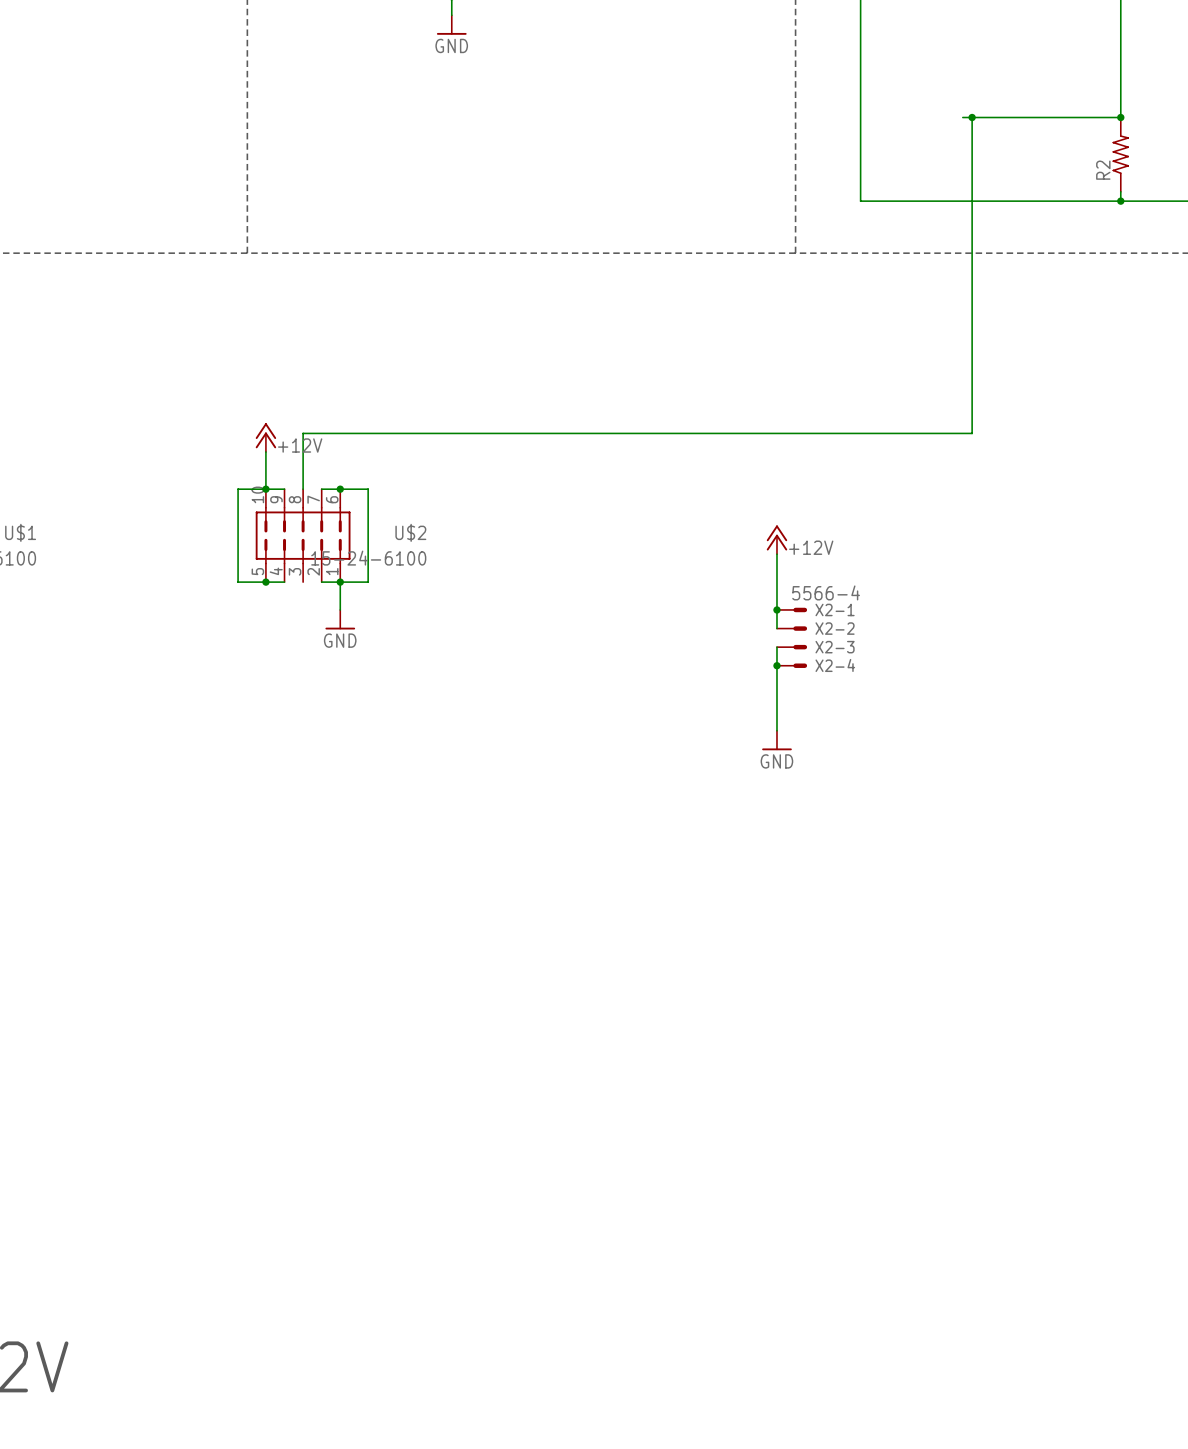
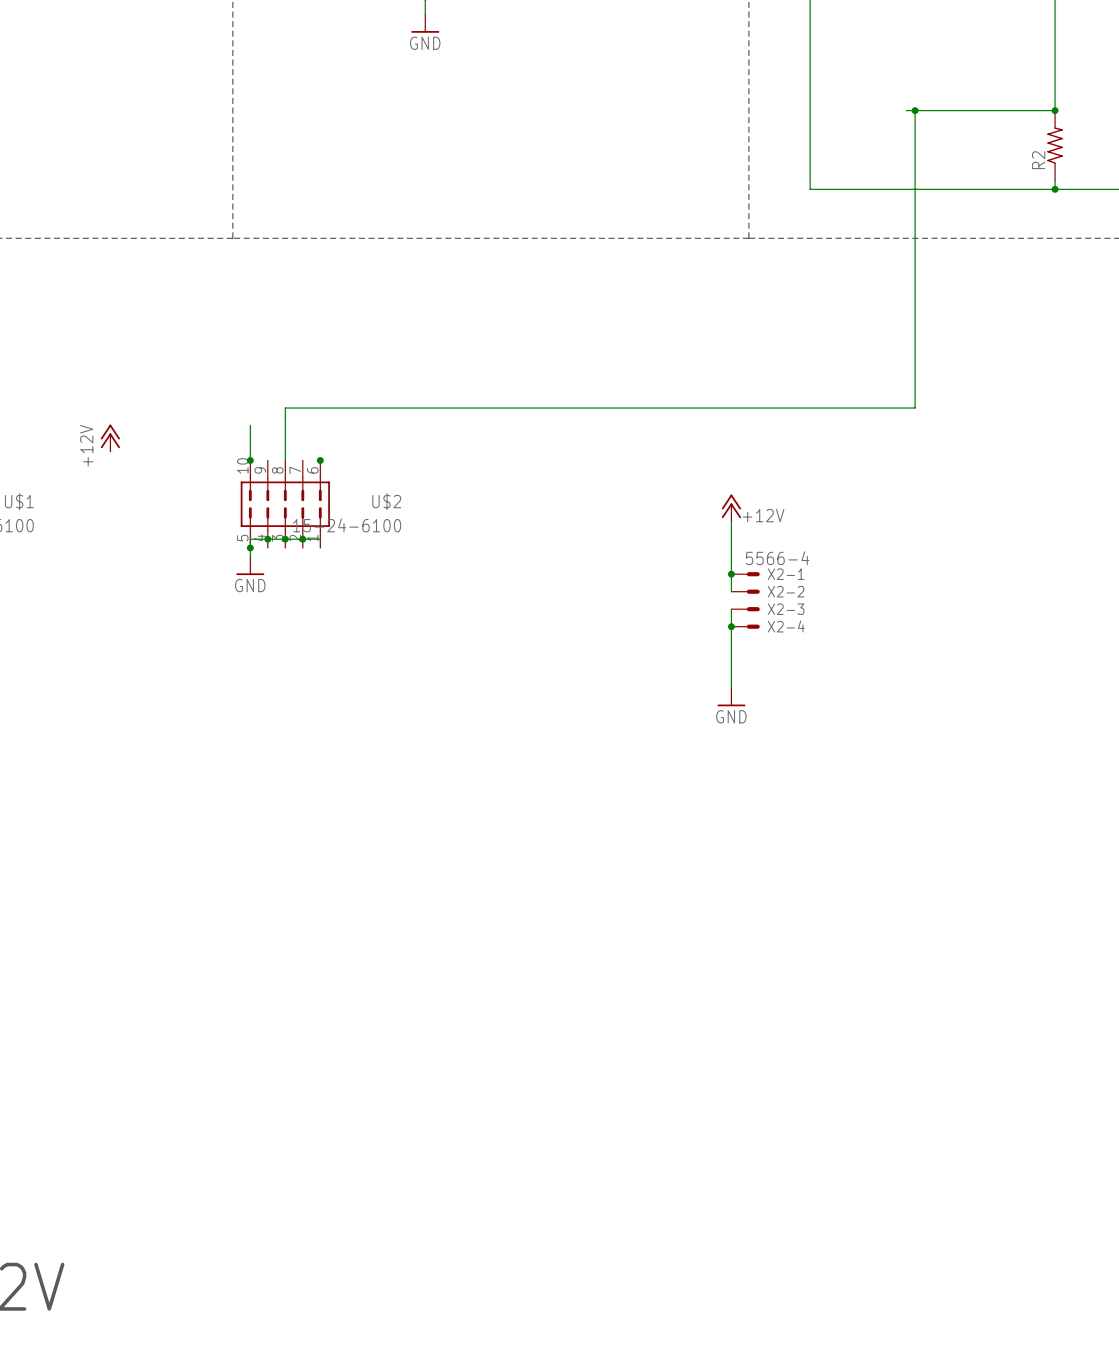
power symbol position: +12V (265, 437) -> +12V (110, 438)
power symbol text rotation: 0° (300, 445) -> 90° counterclockwise (86, 445)
power symbol text position: +12V (300, 445) -> +12V (86, 445)
wire: (284, 489) (238, 489) (238, 582) (284, 582) -> none
wire: (321, 489) (368, 489) (368, 582) (321, 582) -> none
junction: none -> (267, 539)
junction: none -> (285, 539)
junction: none -> (302, 539)
wire: none -> (320, 539) (250, 539) (250, 556)
wire: (340, 582) (340, 609) -> none
junction: (340, 582) -> none
power symbol position: GND (340, 619) -> GND (250, 565)

